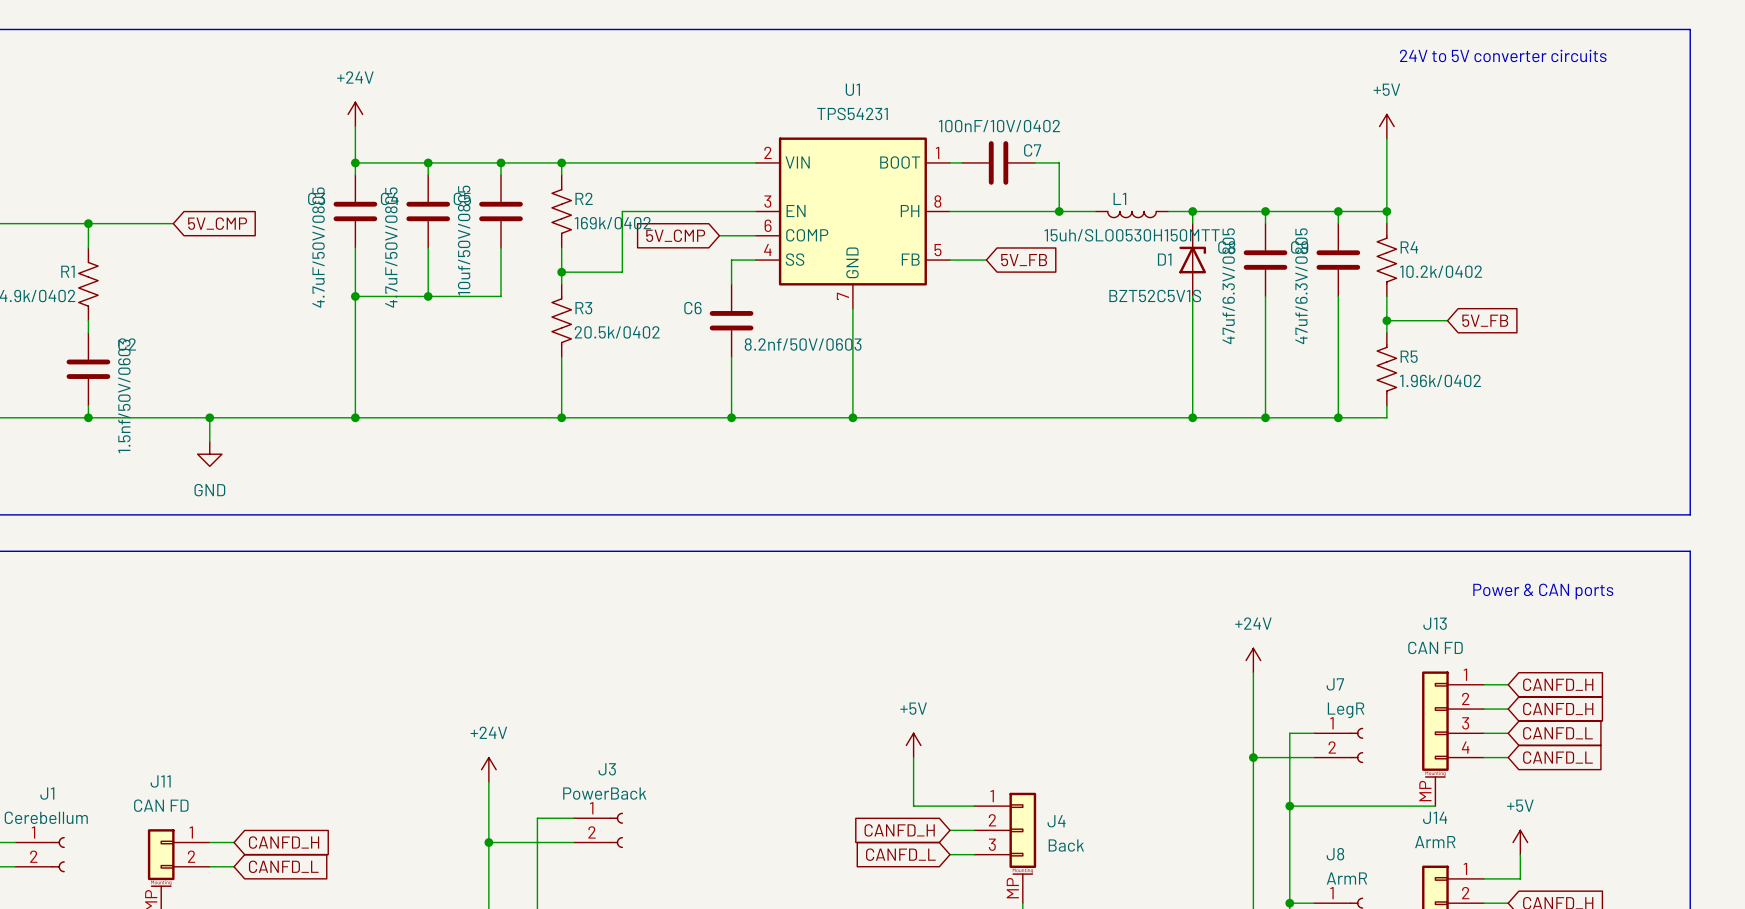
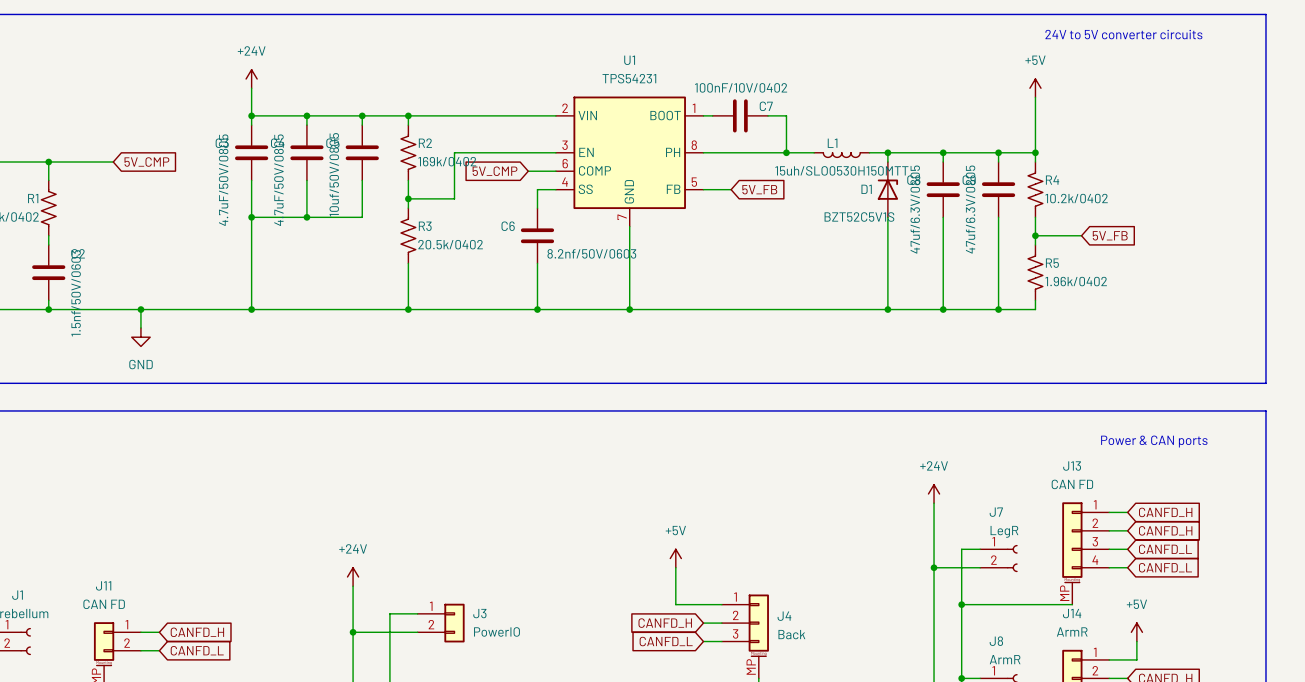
J3 name position: J3 (607, 769) -> J3 (479, 613)
J3 value: PowerBack (604, 793) -> PowerIO (496, 631)
J3 symbol: [573, 812, 624, 849] -> [417, 603, 465, 643]

